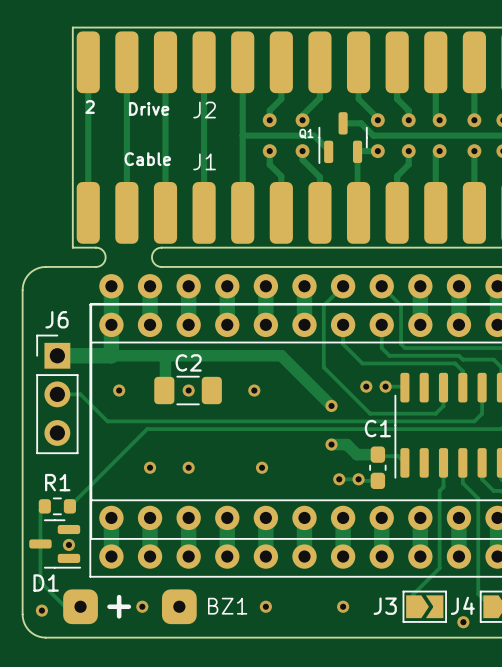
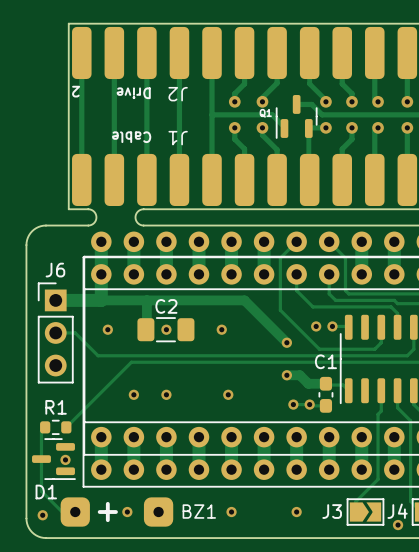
text rotation: 0° (90, 106) -> 180° (76, 91)
text rotation: 0° (149, 108) -> 180° (133, 93)
J2 name rotation: 0° (204, 110) -> 180° (178, 94)
text rotation: 0° (147, 159) -> 180° (131, 137)
J1 name rotation: 0° (204, 161) -> 180° (178, 138)

